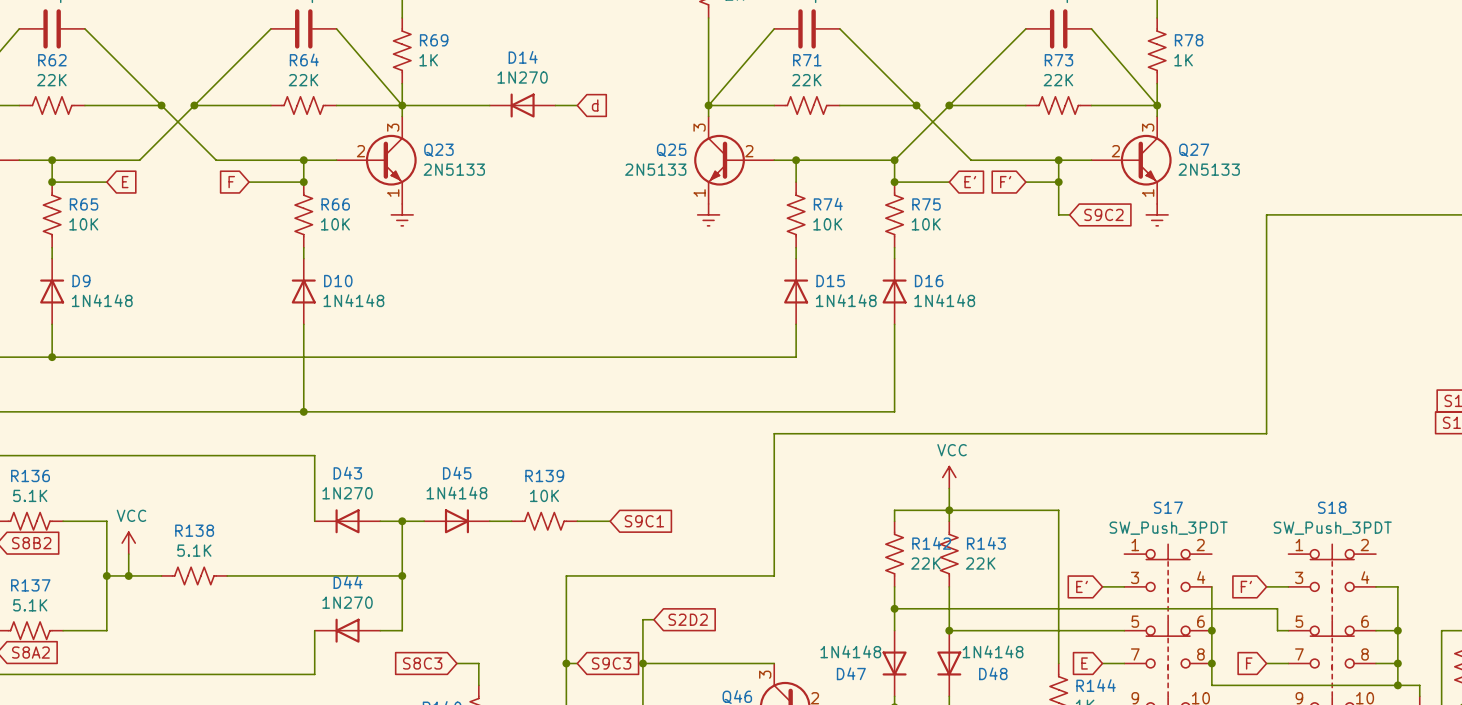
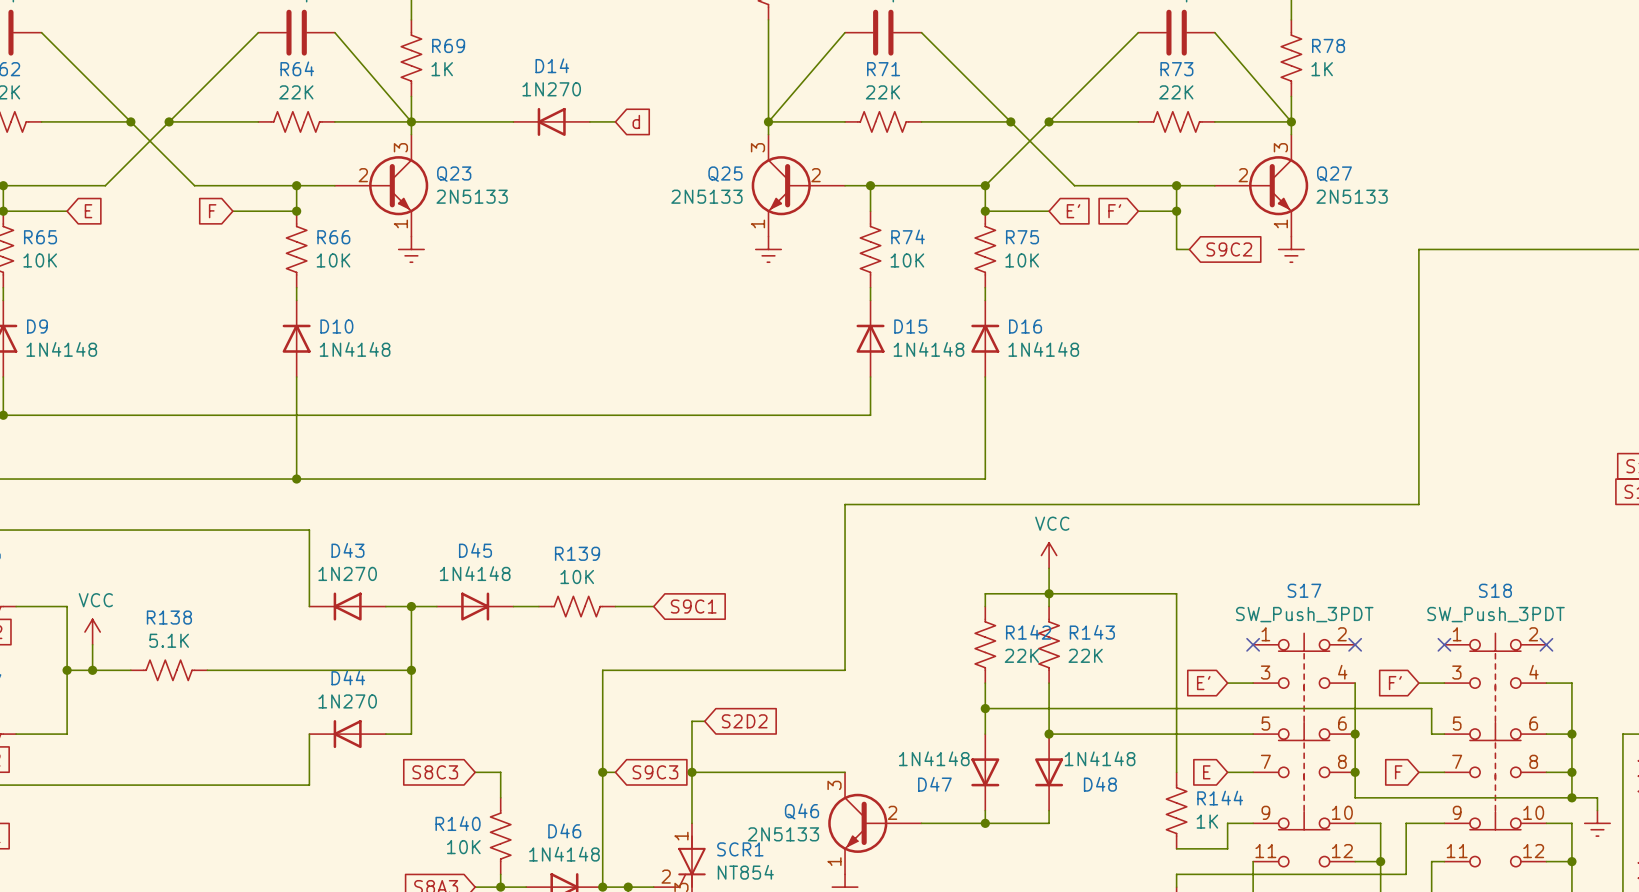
no-connect mark: none -> (1253, 644)
no-connect mark: none -> (1355, 644)
no-connect mark: none -> (1444, 644)
no-connect mark: none -> (1546, 644)

